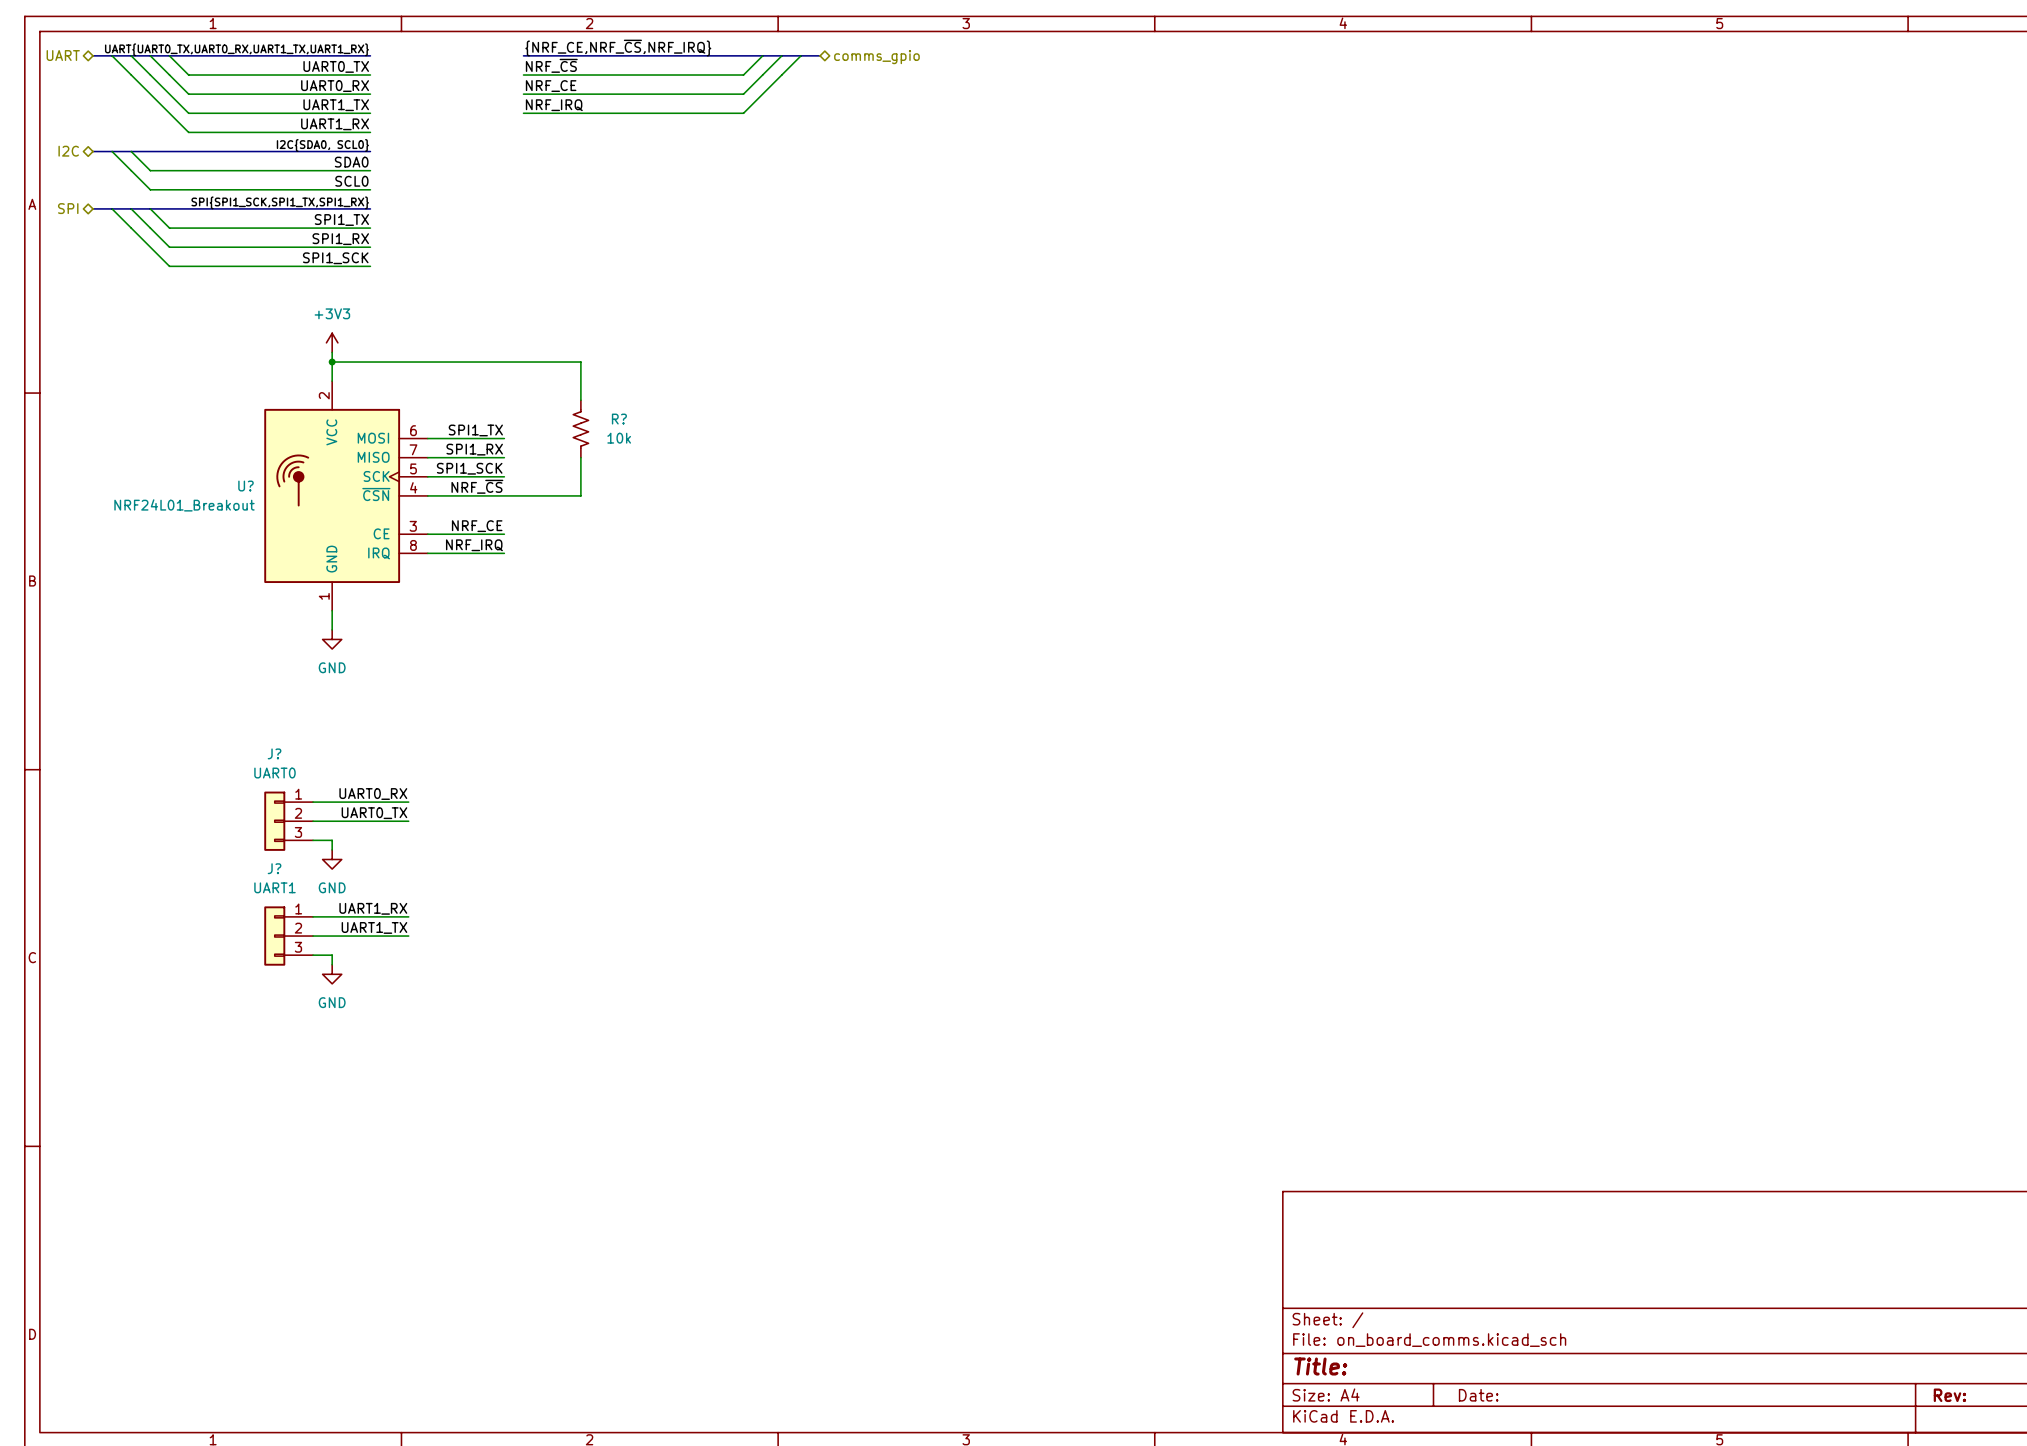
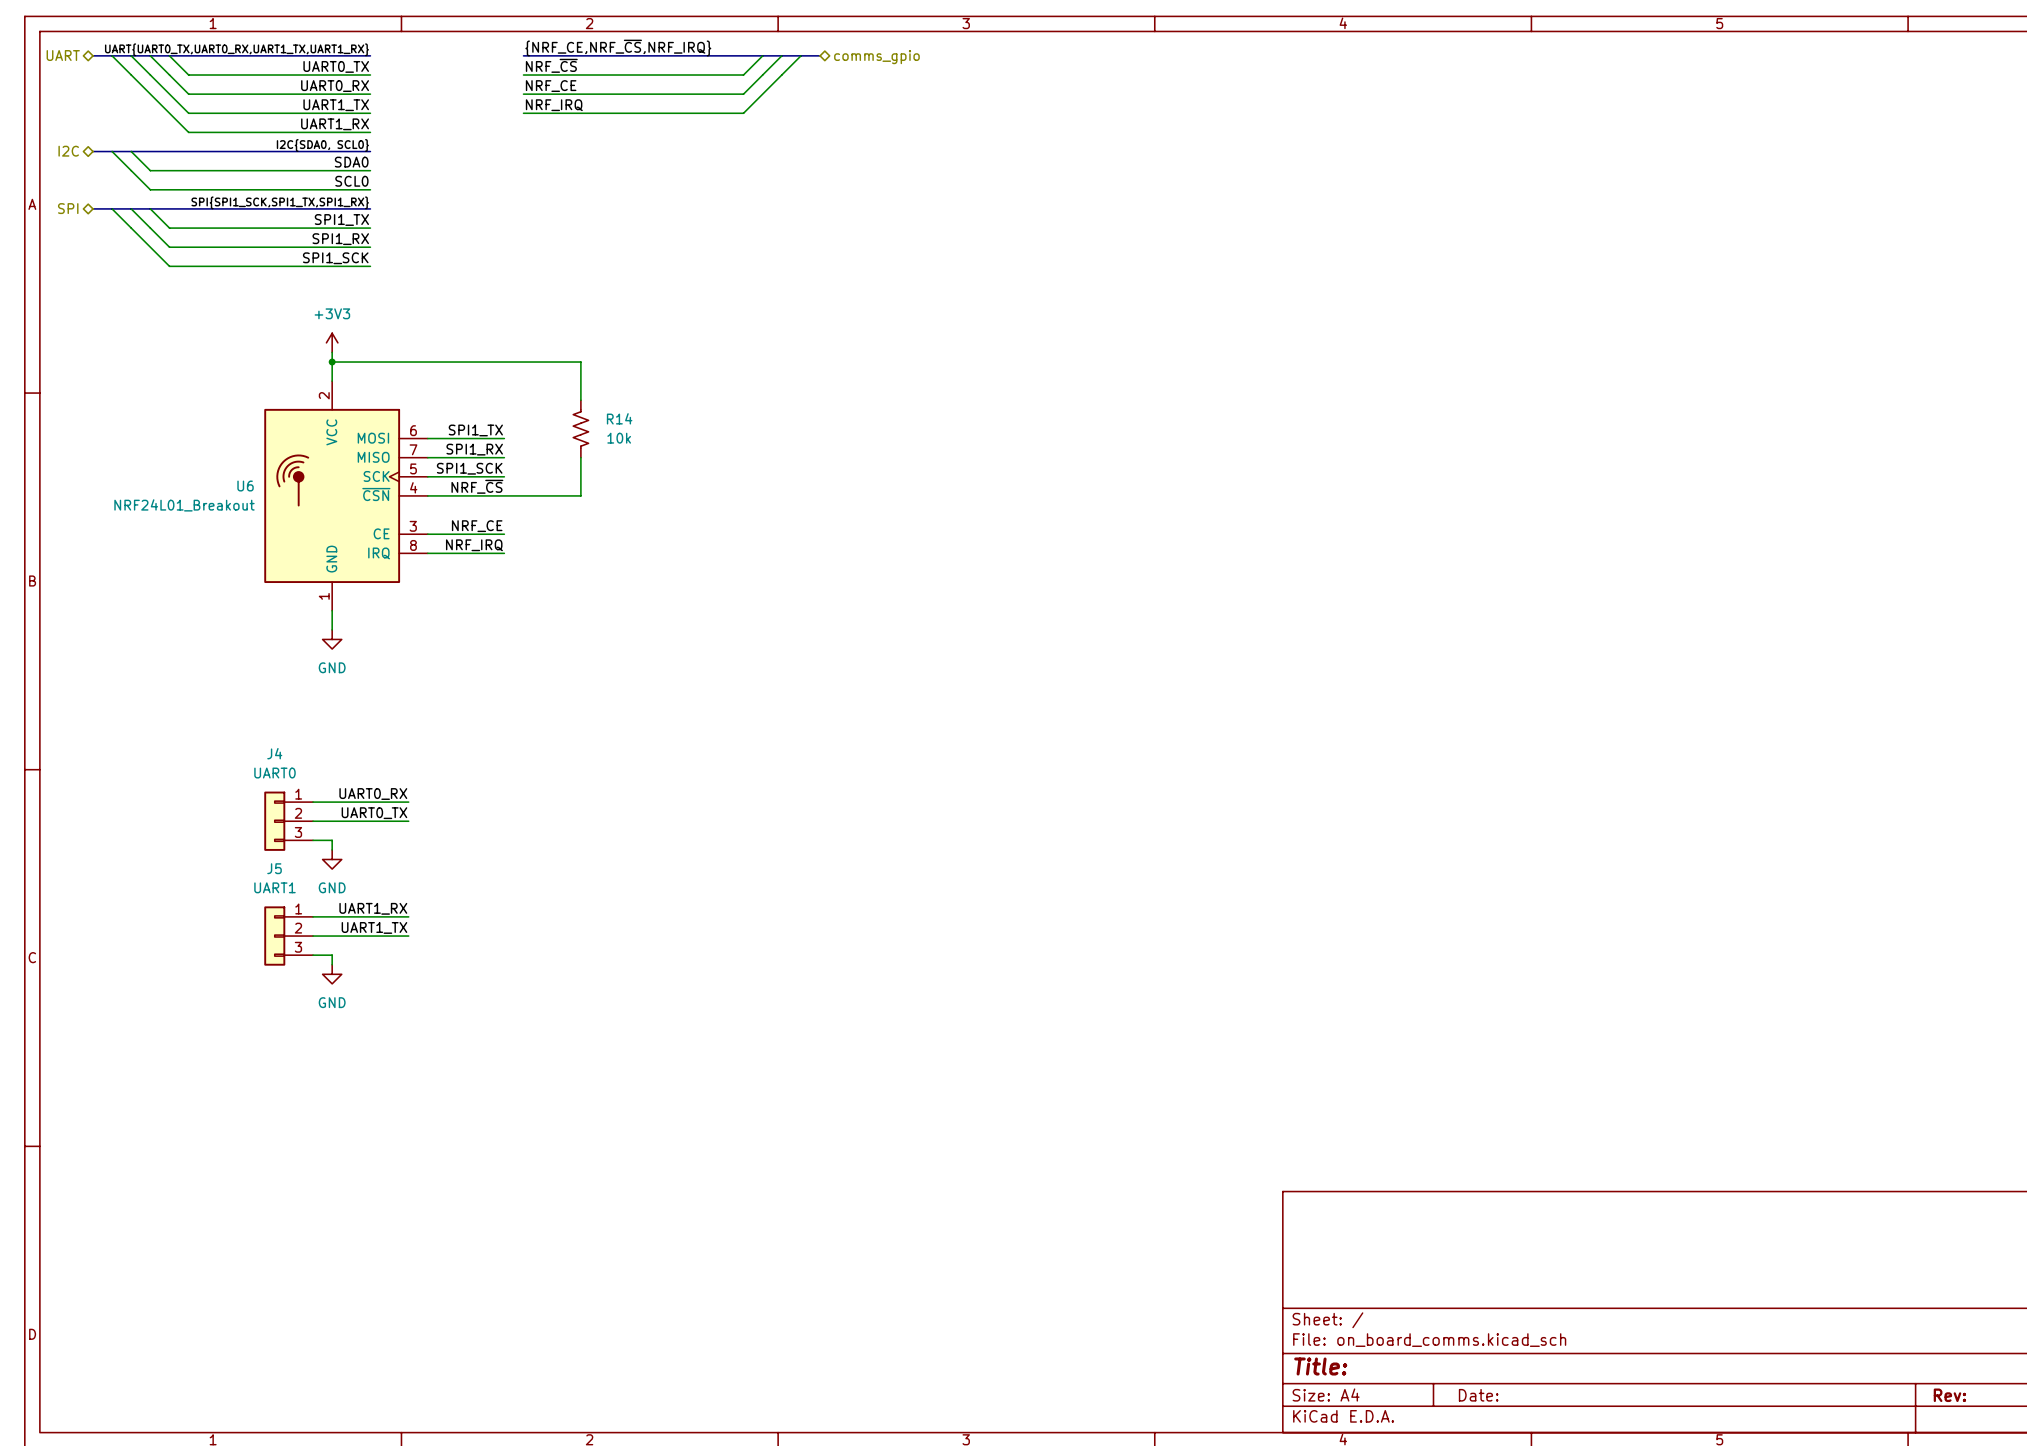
R? name: R? (619, 419) -> R14 (619, 418)
U? name: U? (245, 486) -> U6 (245, 486)
J? name: J? (274, 753) -> J4 (274, 753)
J? name: J? (274, 868) -> J5 (274, 868)

